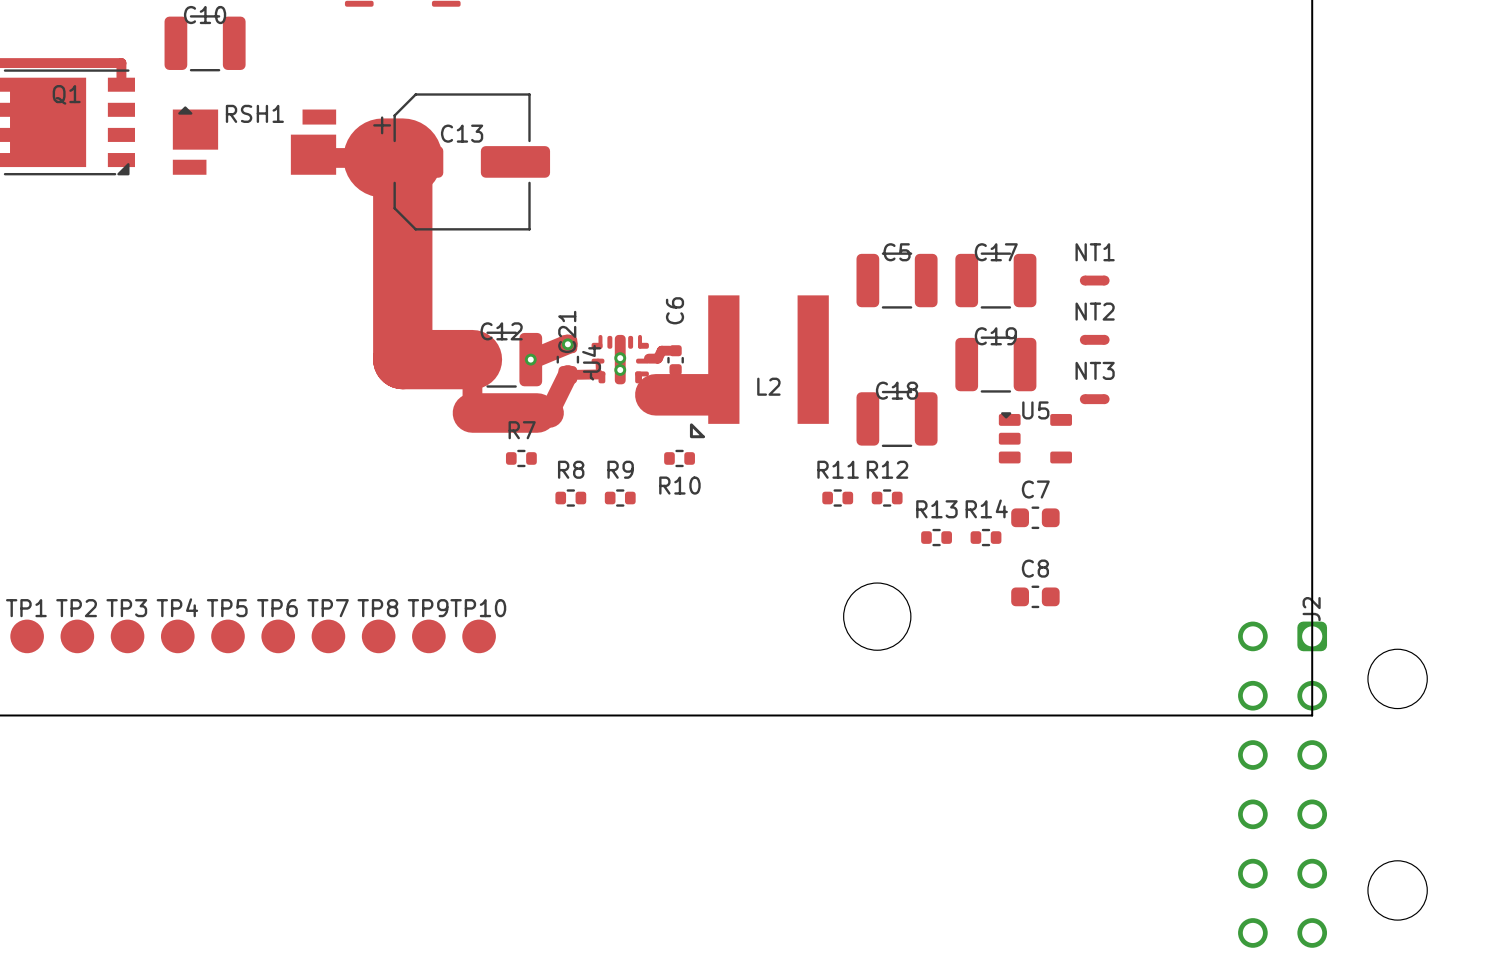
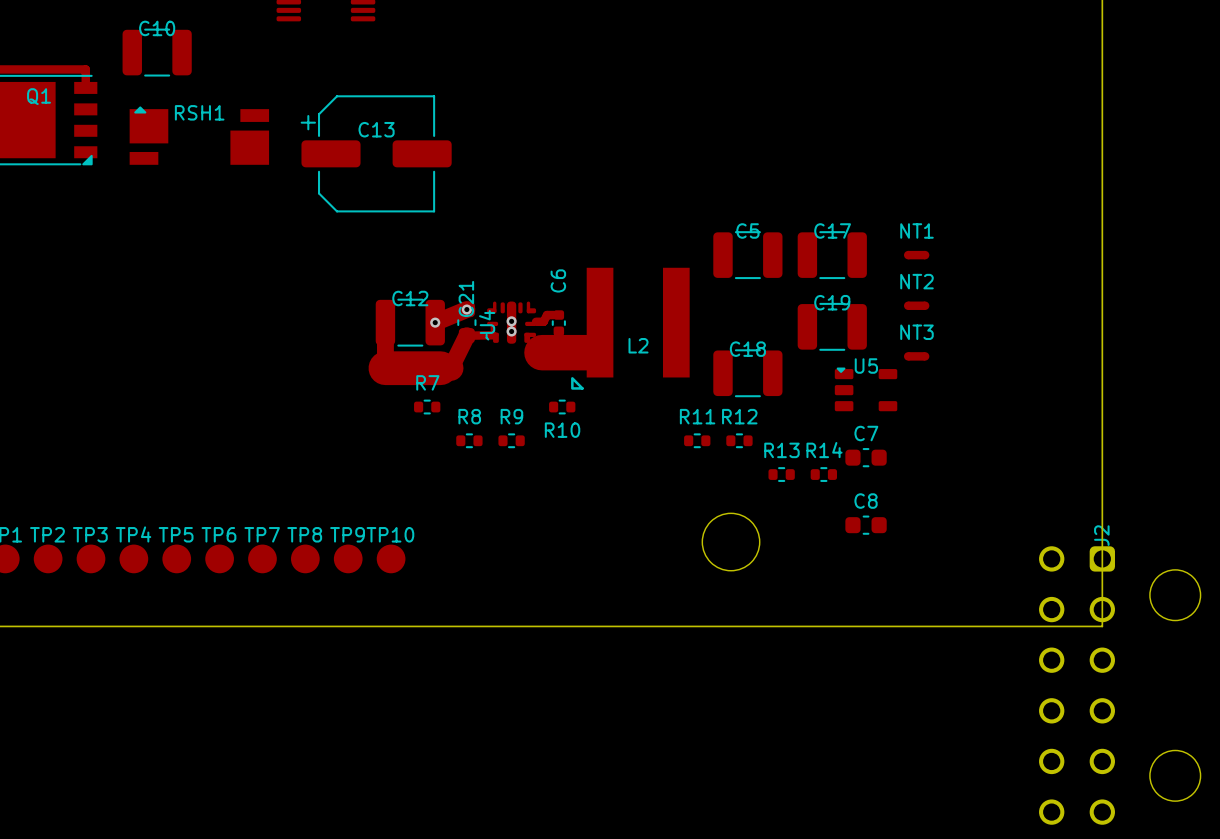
top track: (323, 157) (402, 157) (402, 359) (472, 359) -> none

